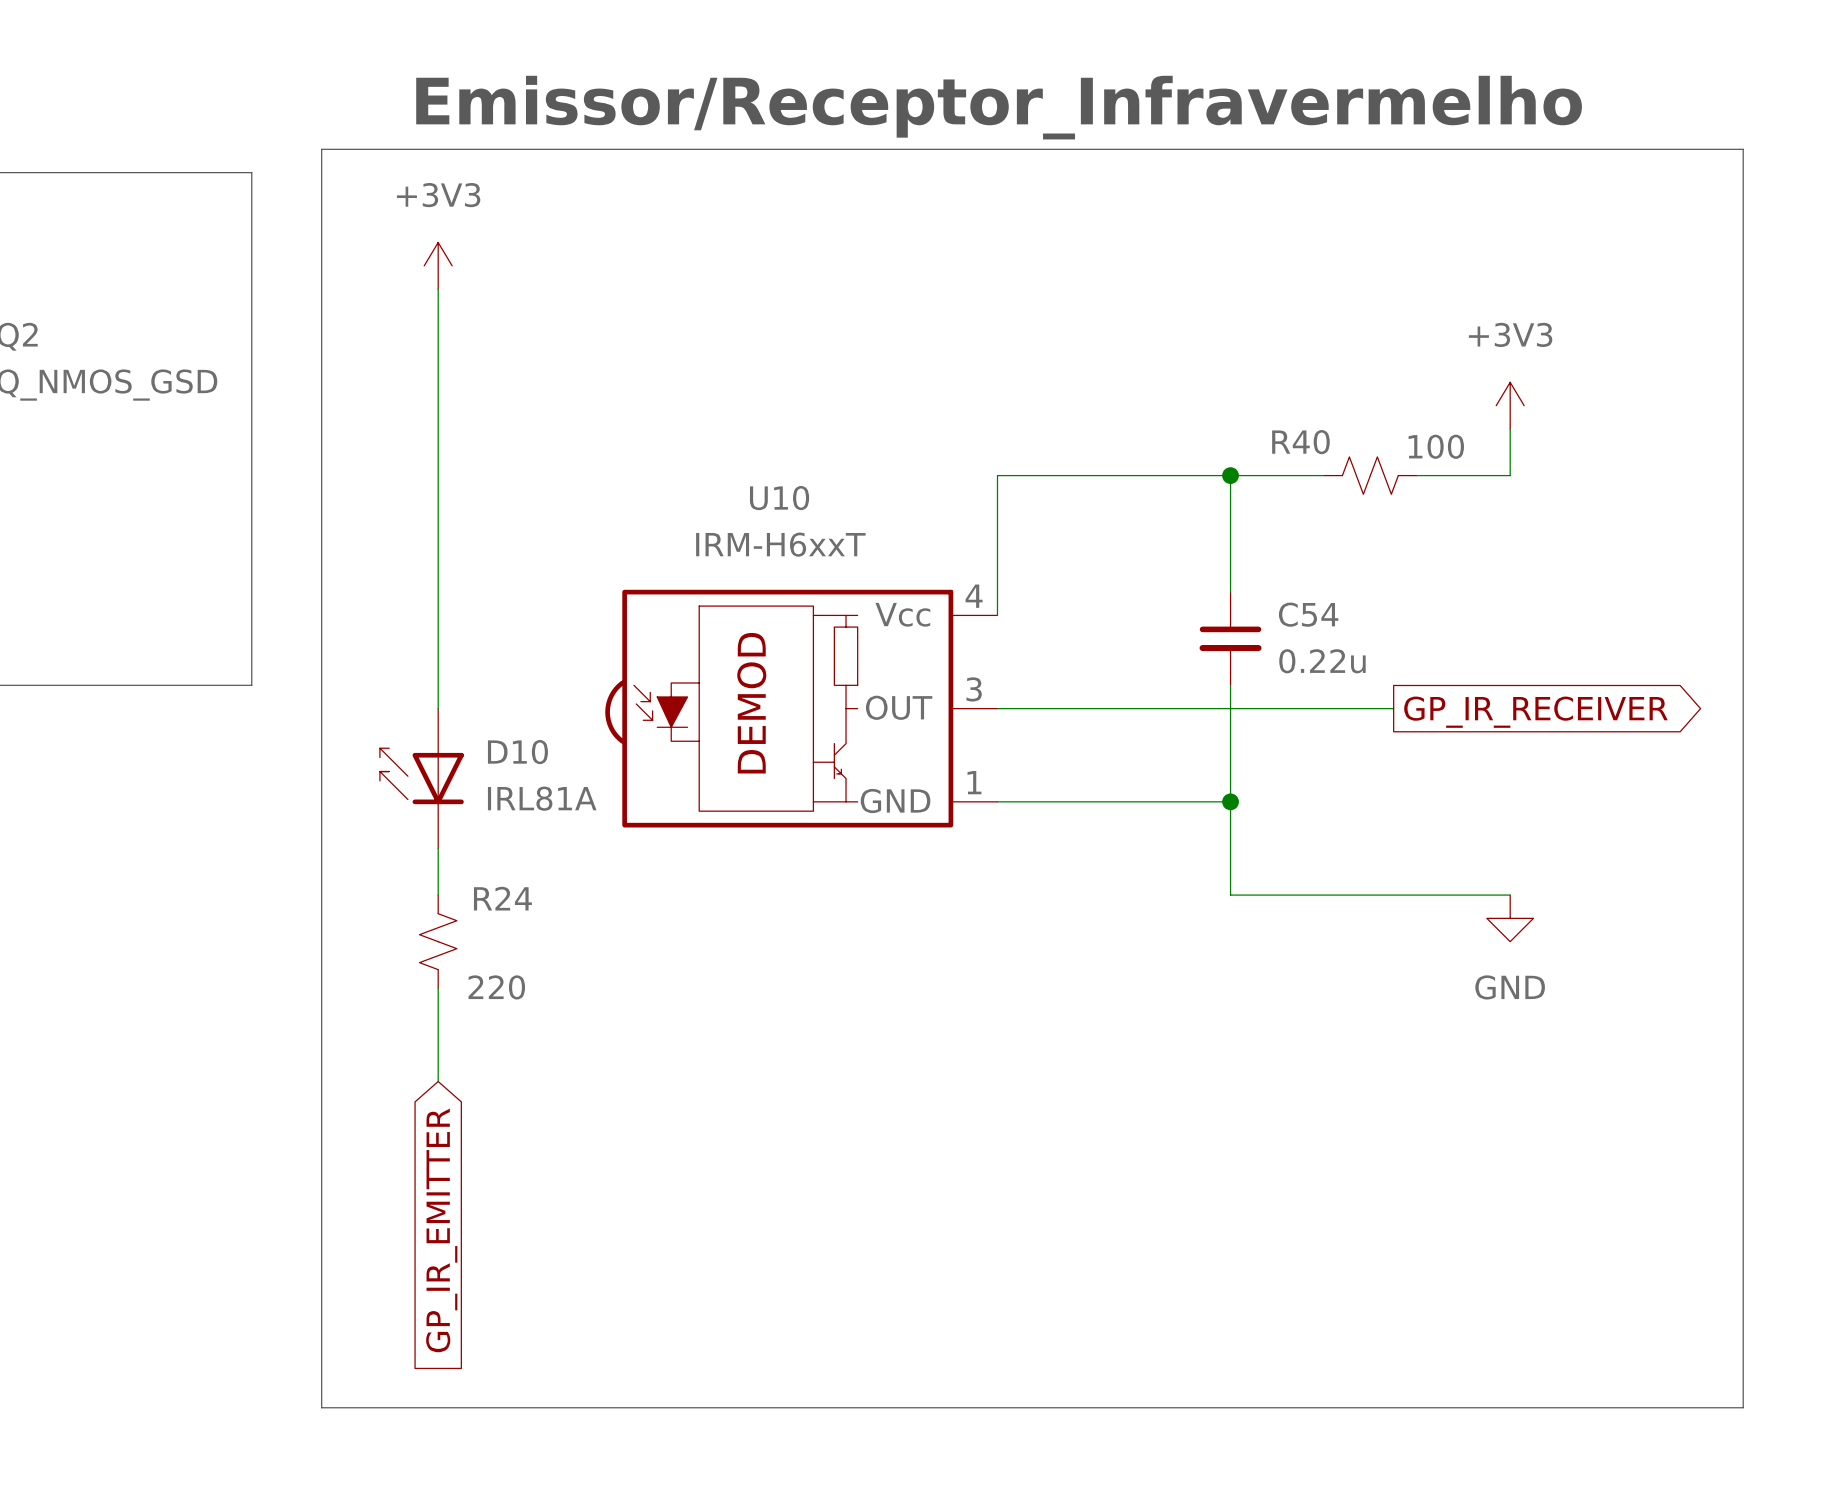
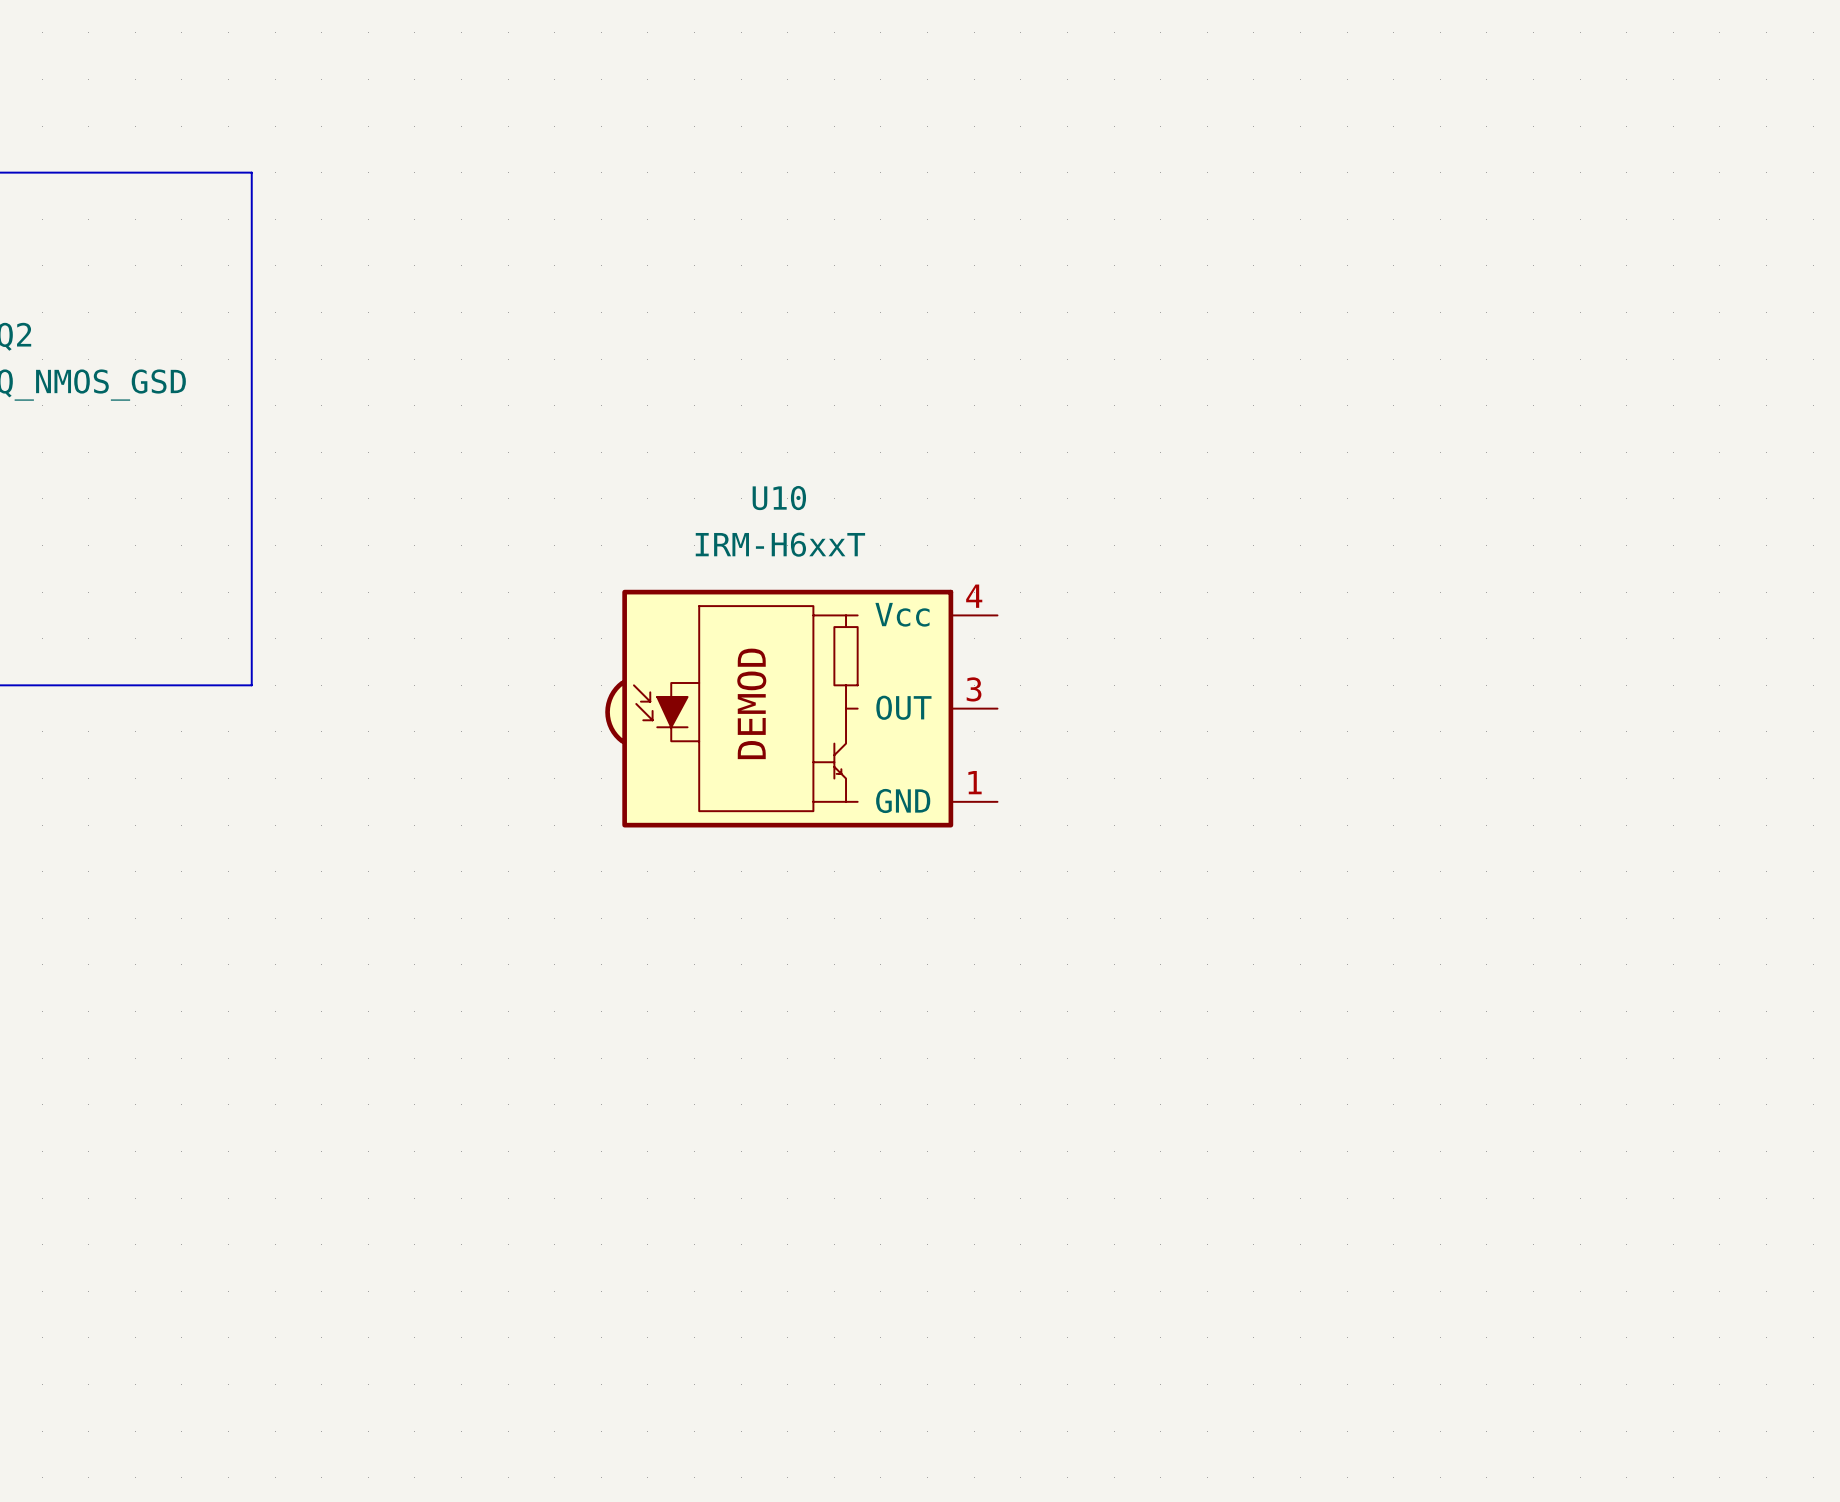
text: Emissor/Receptor_Infravermelho (999, 107) -> none
line: (321, 149) (321, 1407) (1743, 1407) (1743, 149) (321, 149) -> none
power symbol: +3V3 (438, 265) -> none
wire: (438, 289) (438, 708) -> none
power symbol: +3V3 (1510, 405) -> none
wire: (1510, 428) (1510, 475) (1416, 475) -> none
wire: (1230, 475) (1230, 592) -> none
junction: (1230, 475) -> none
wire: (1323, 475) (997, 475) (997, 615) -> none
R40: 100 (1370, 475) -> none
C54: 0.22u (1230, 638) -> none
wire: (1230, 685) (1230, 895) (1510, 895) -> none
wire: (997, 708) (1393, 708) -> none
global label: GP_IR_RECEIVER (1535, 712) -> none
D10: IRL81A (421, 778) -> none
wire: (997, 801) (1230, 801) -> none
junction: (1230, 801) -> none
wire: (438, 848) (438, 895) -> none
power symbol: GND (1510, 918) -> none
R24: 220 (438, 941) -> none
wire: (438, 988) (438, 1081) -> none
global label: GP_IR_EMITTER (441, 1230) -> none

